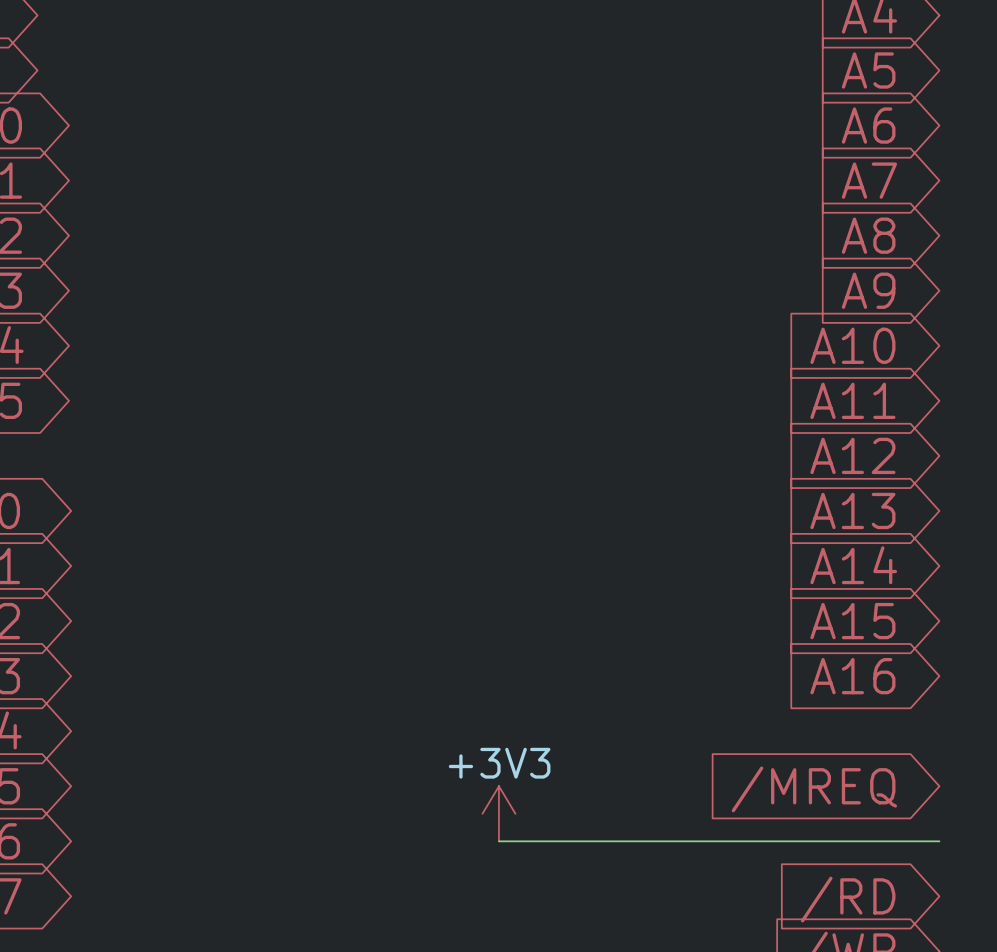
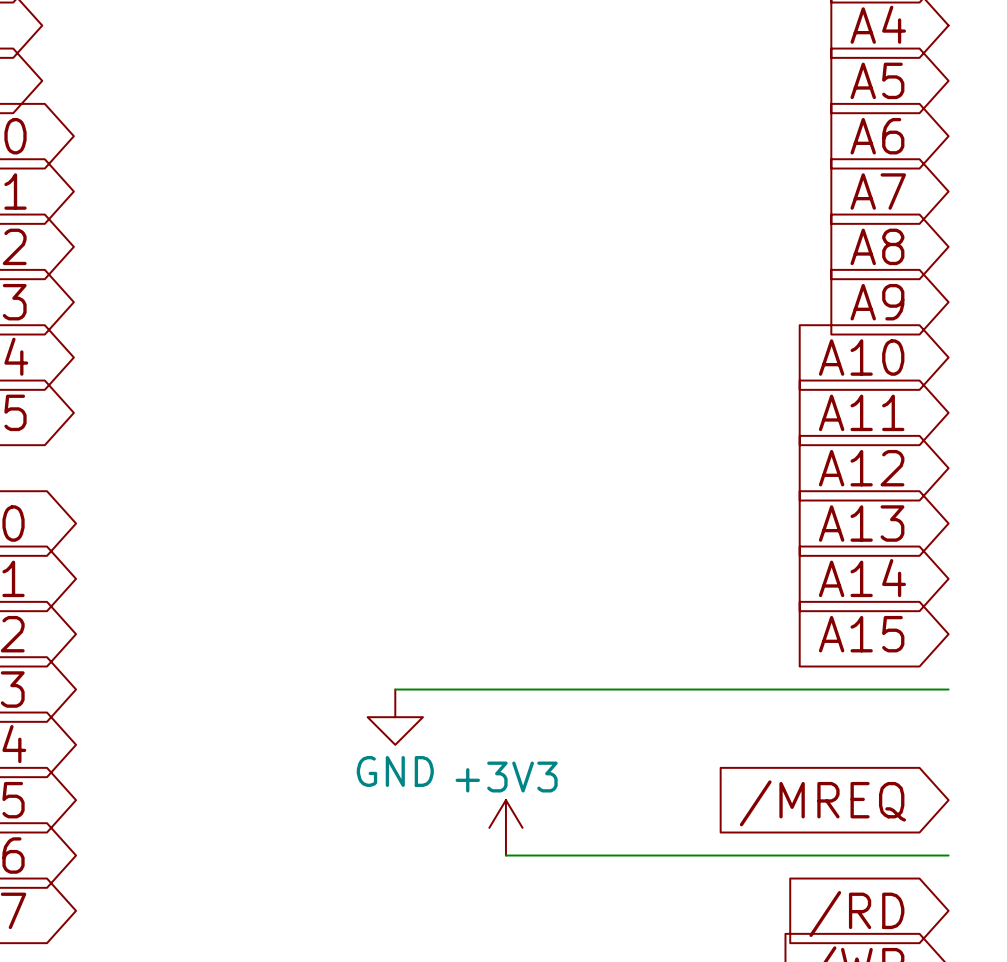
wire: none -> (395, 689) (948, 689)
global label: A16 (852, 676) -> none
power symbol: none -> GND (395, 717)

